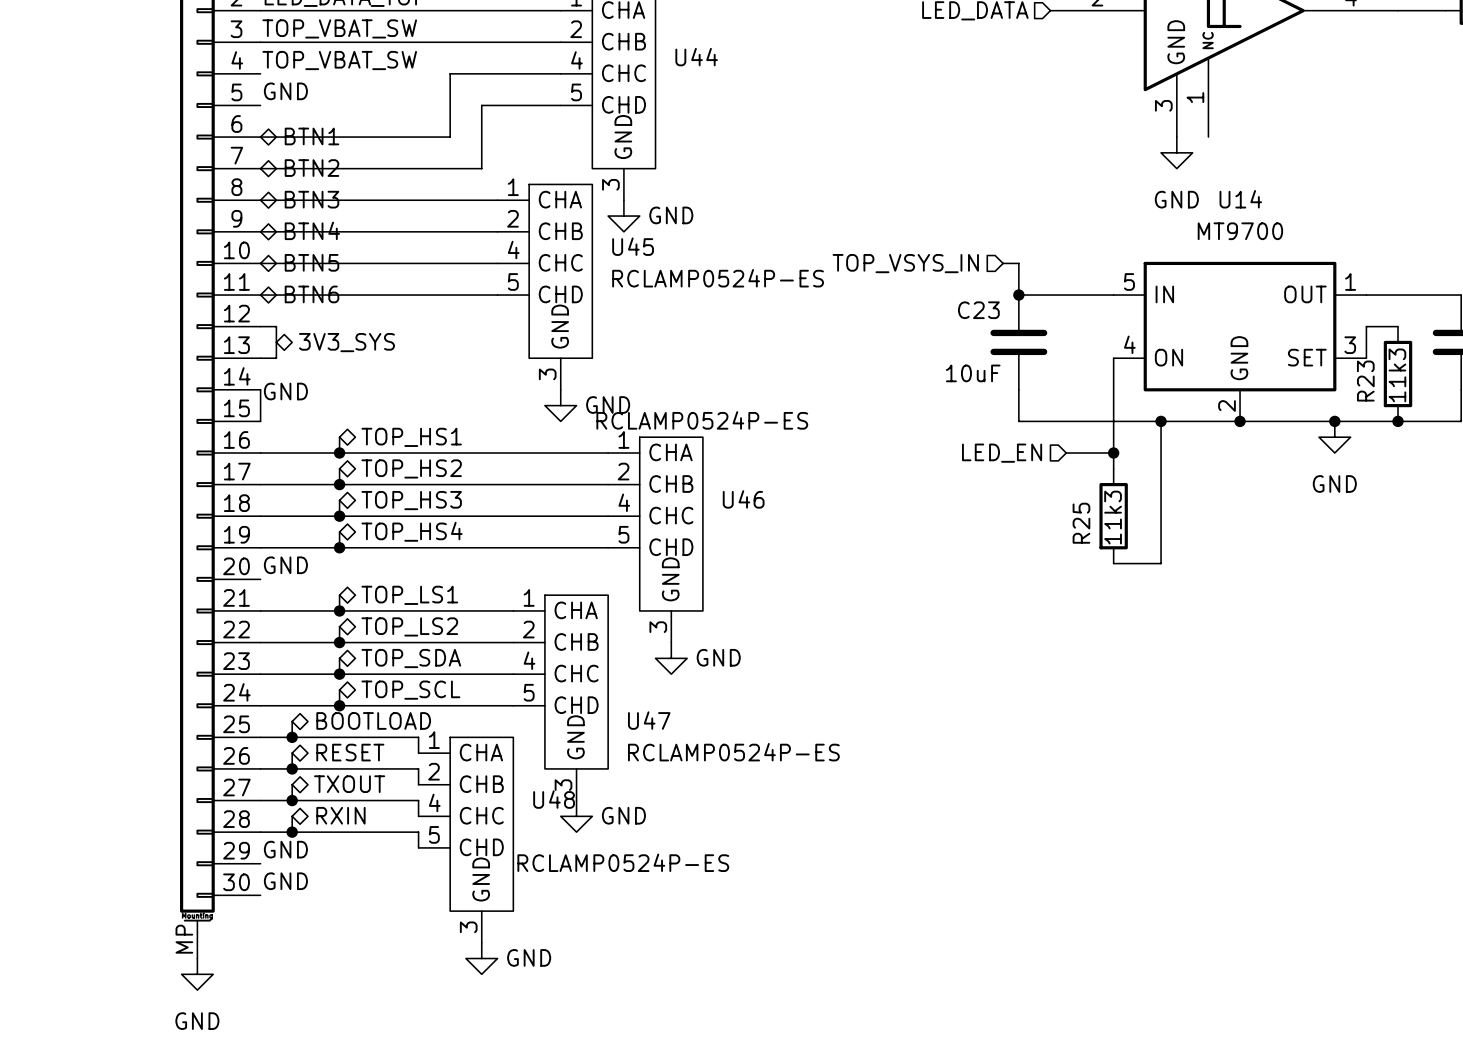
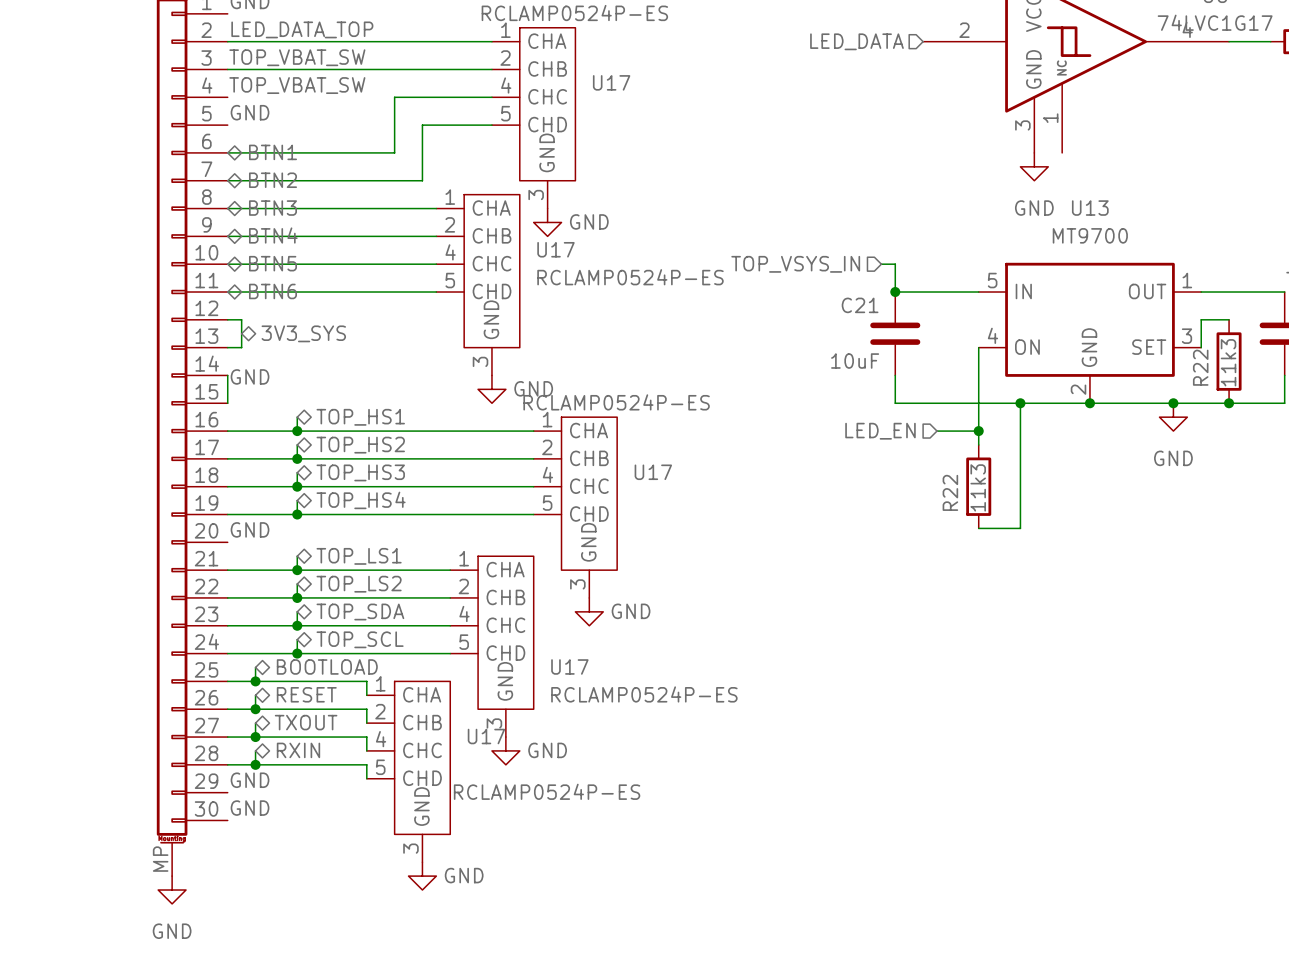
U44 name: U44 (696, 57) -> U17 (611, 82)
U14 name: U14 (1240, 199) -> U13 (1090, 208)
U45 name: U45 (633, 246) -> U17 (555, 249)
C23 name: C23 (978, 310) -> C21 (860, 305)
R23 name: R23 (1365, 381) -> R22 (1200, 367)
U46 name: U46 (743, 499) -> U17 (653, 472)
R25 name: R25 (1081, 523) -> R22 (950, 492)
U47 name: U47 (649, 720) -> U17 (569, 666)
U48 name: U48 (554, 799) -> U17 (486, 736)

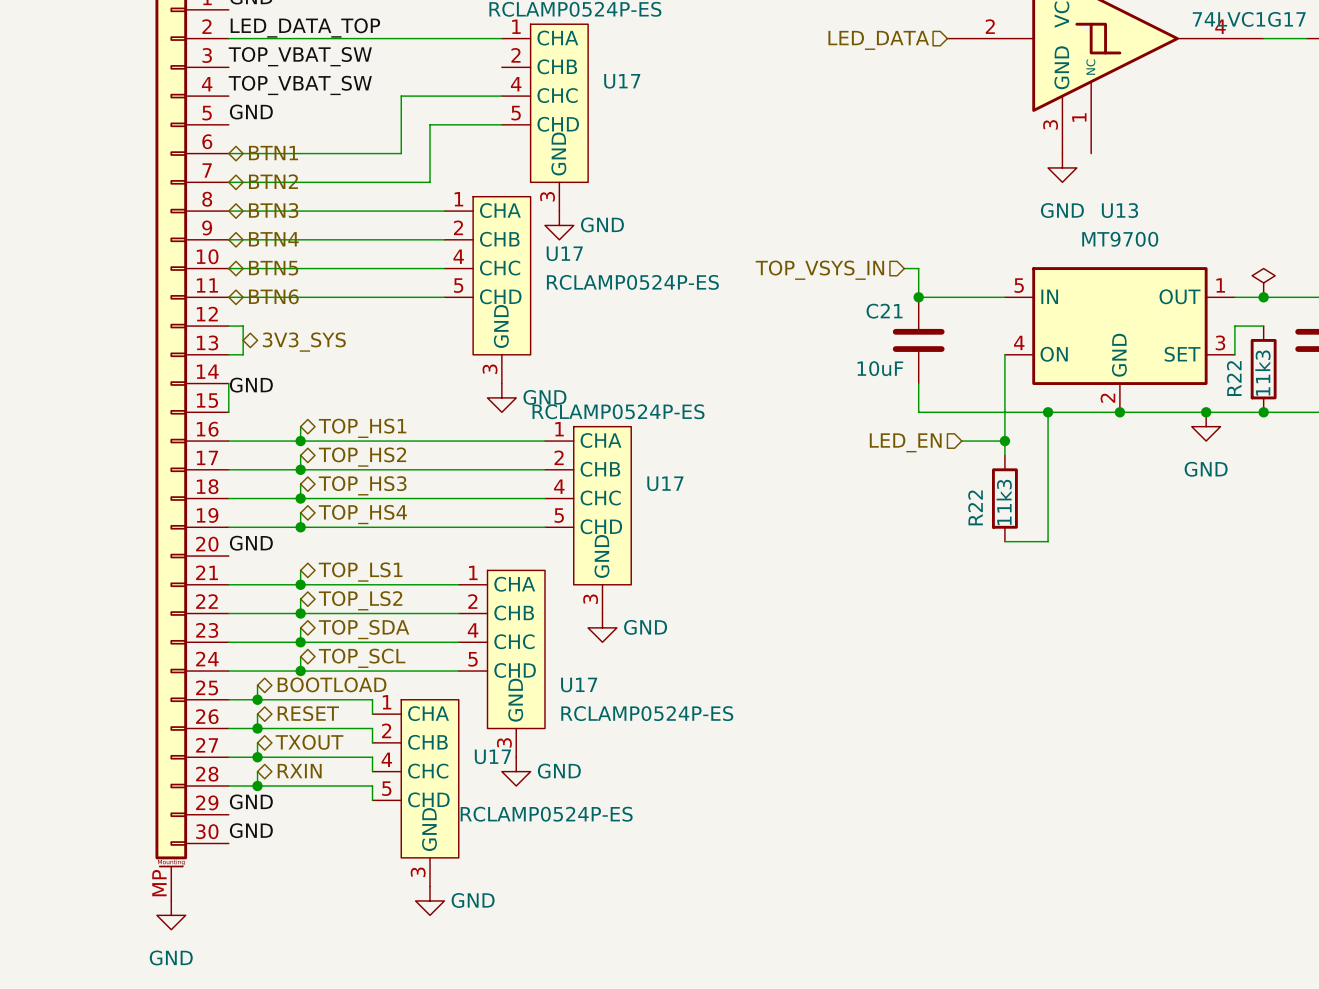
wire: (227, 69) (491, 69) -> none
power symbol: none -> (1263, 282)
junction: none -> (1263, 297)

